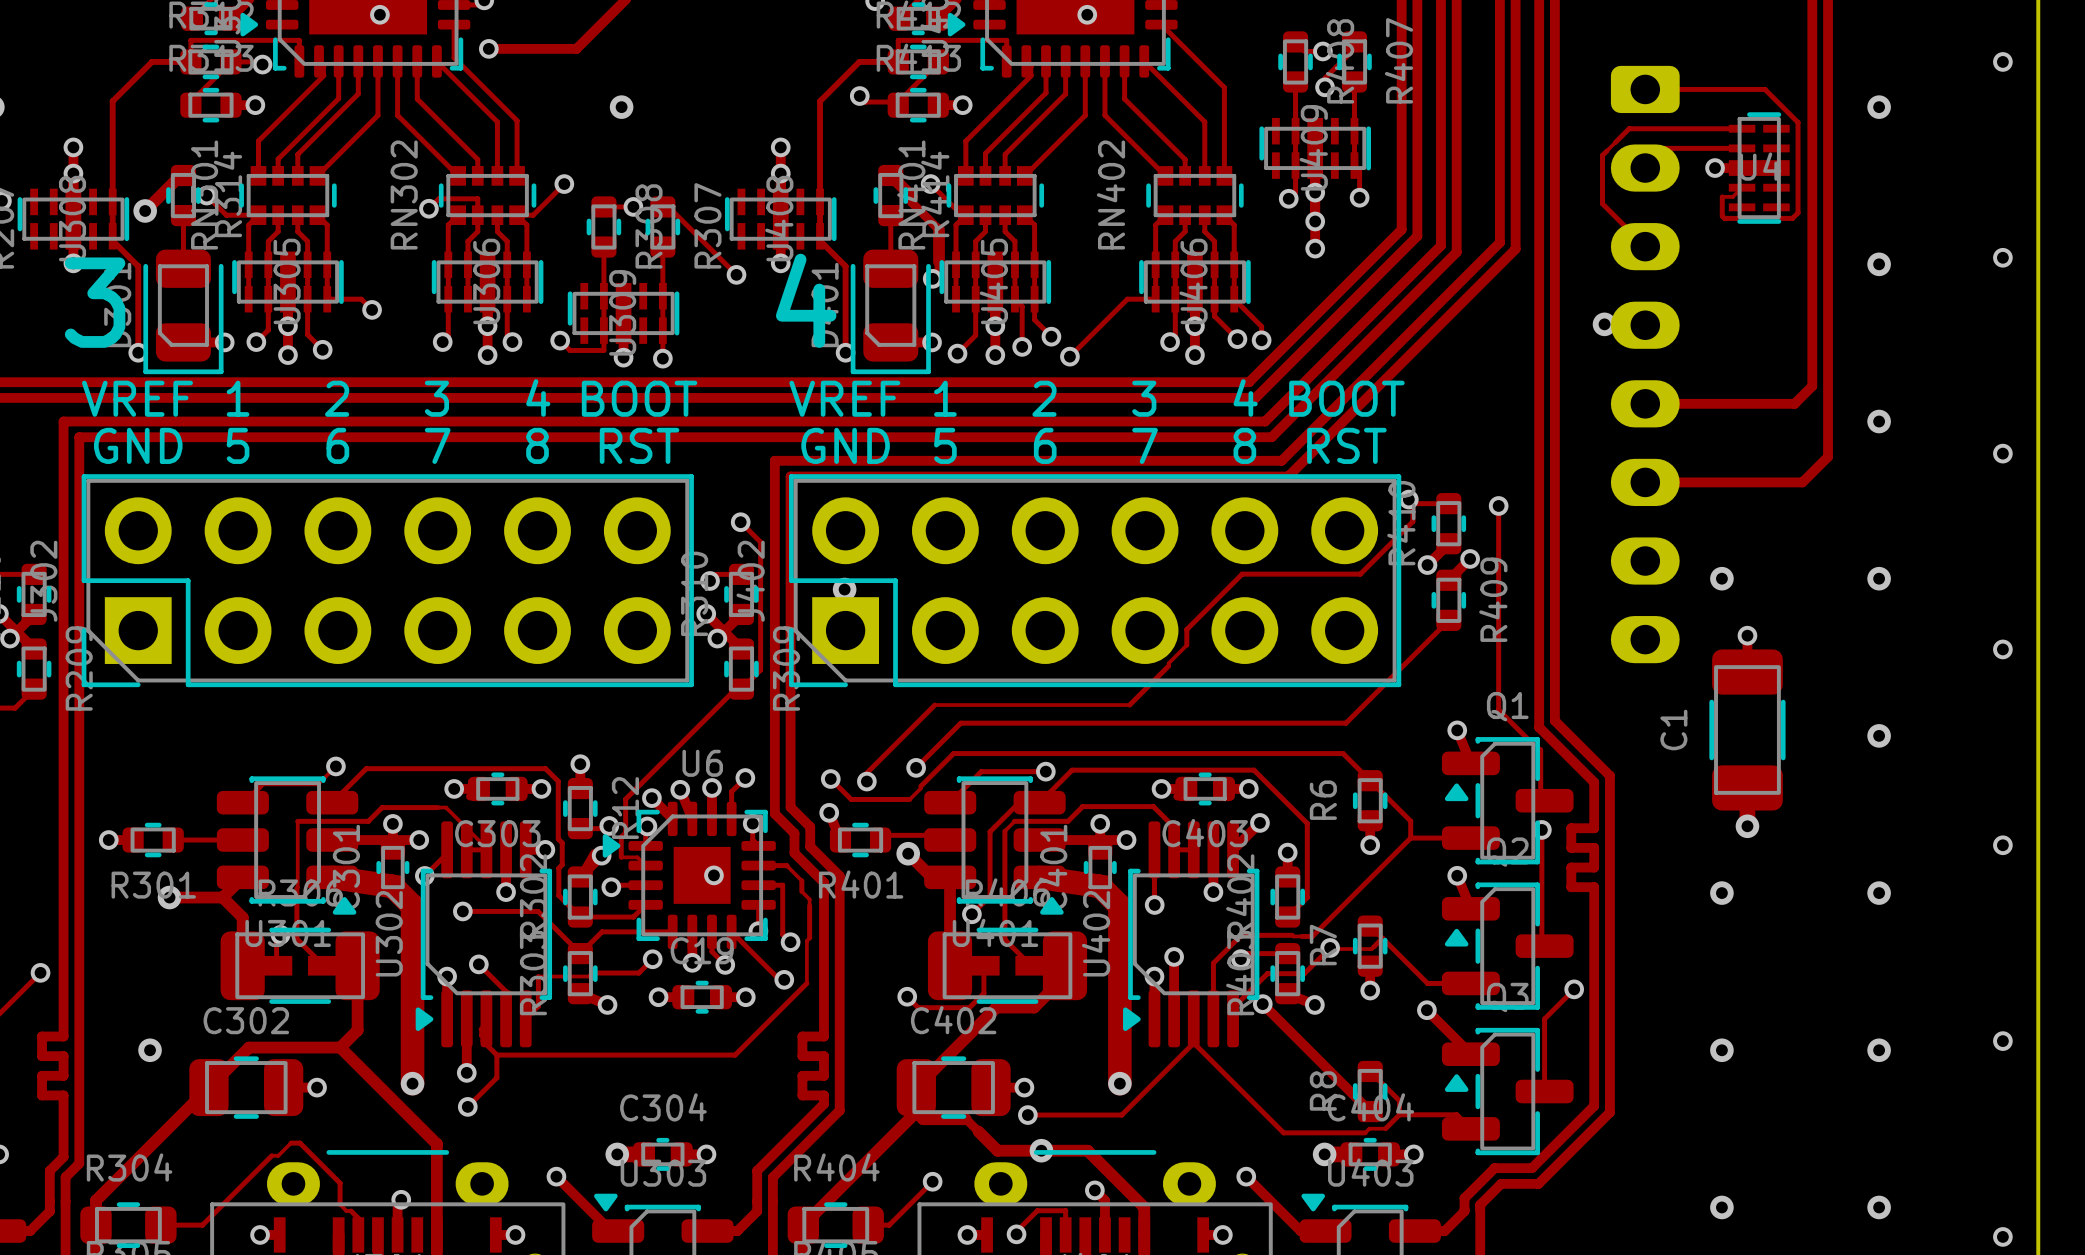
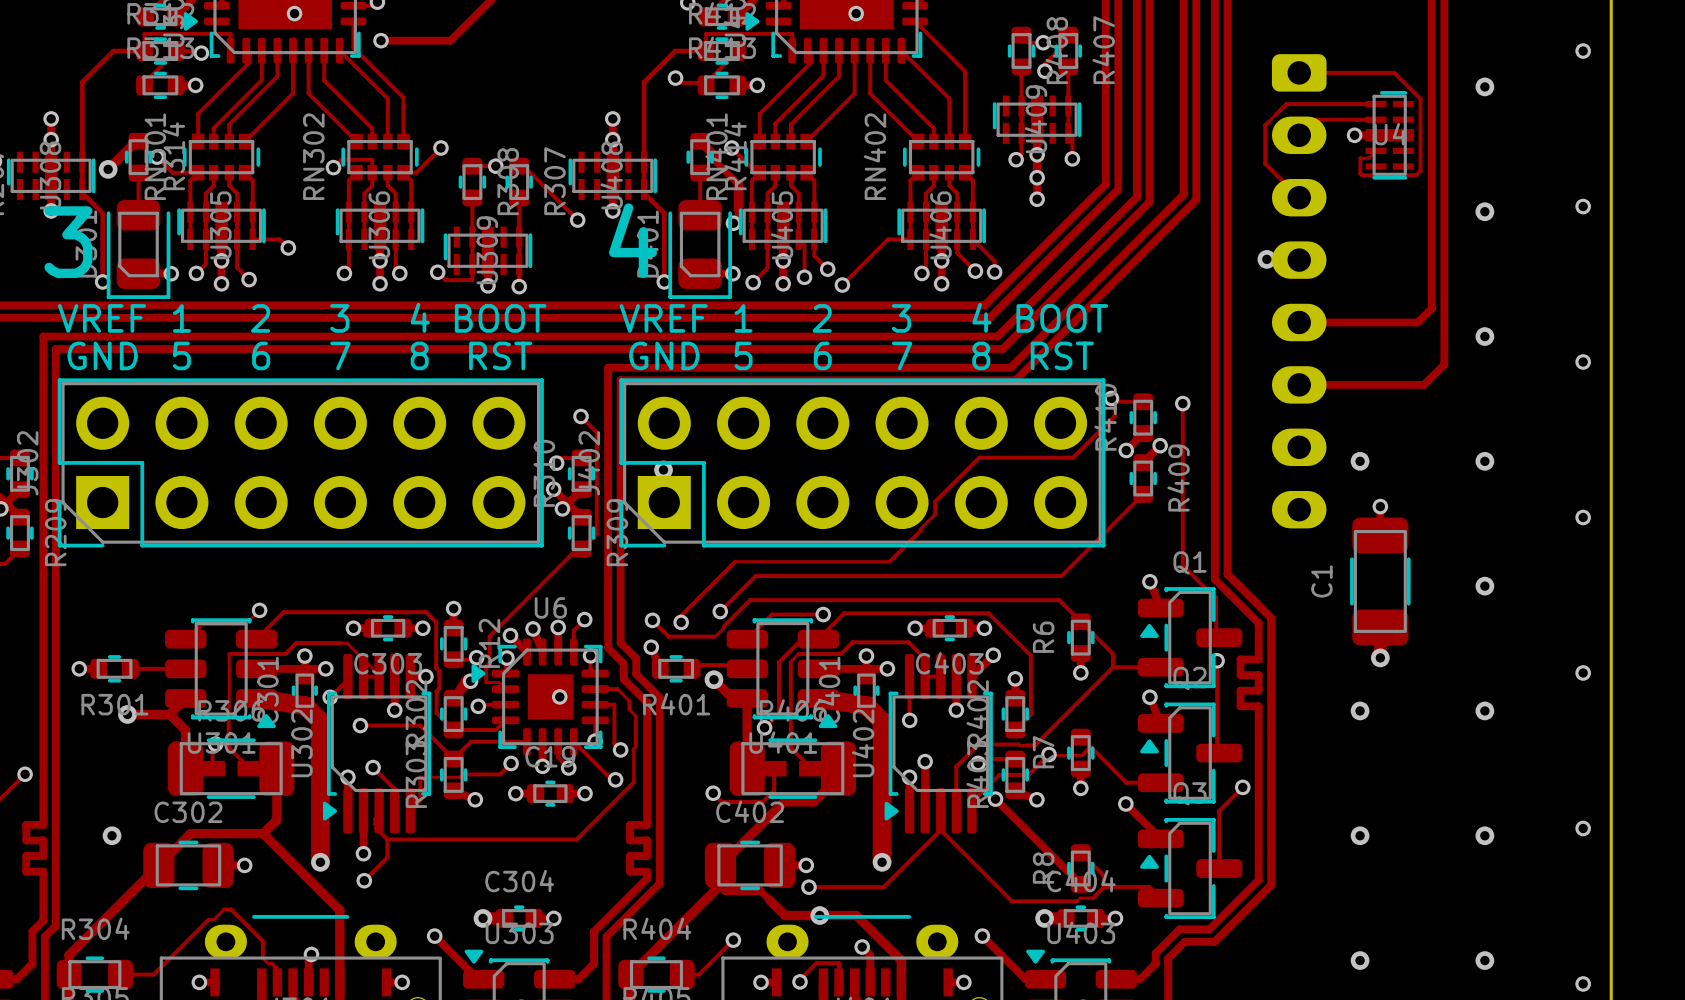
via: (621, 107) -> none

